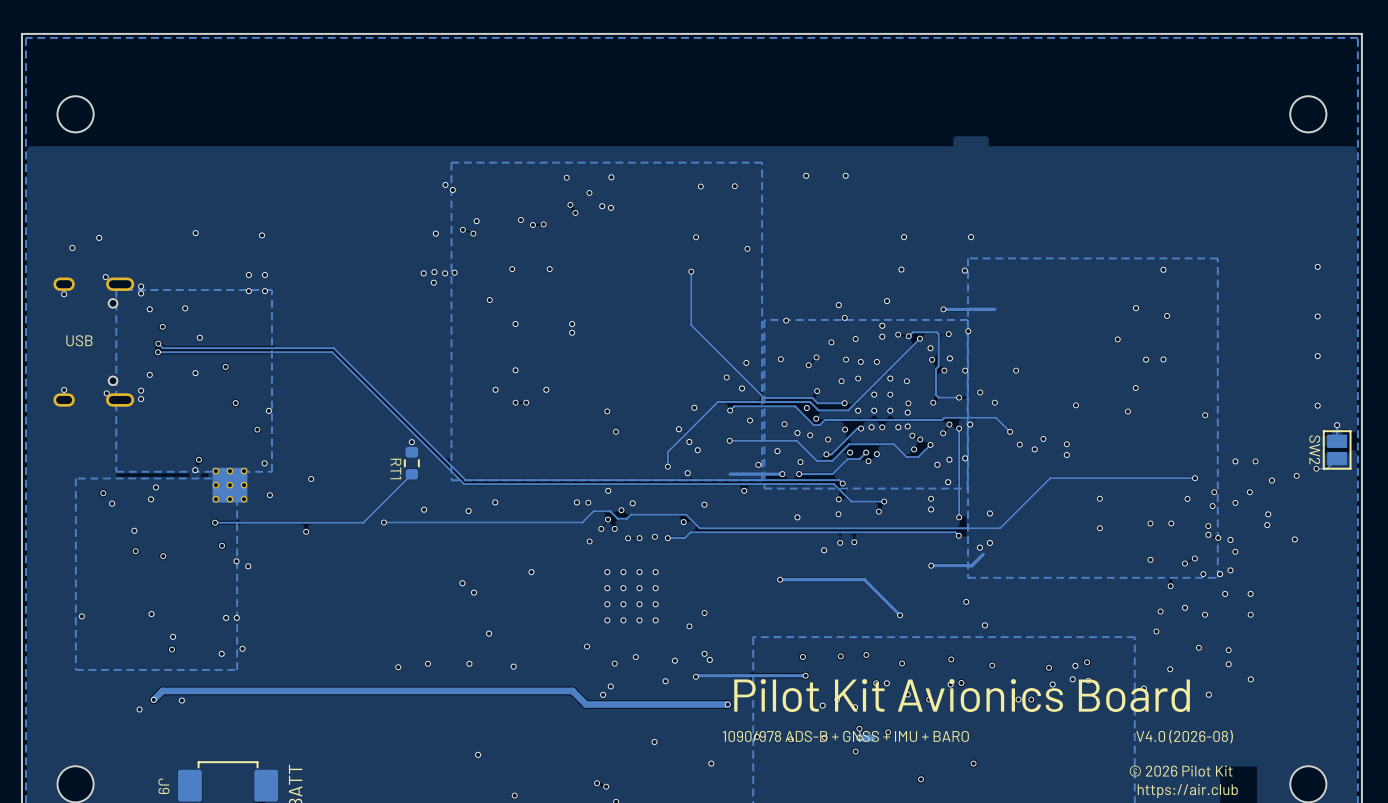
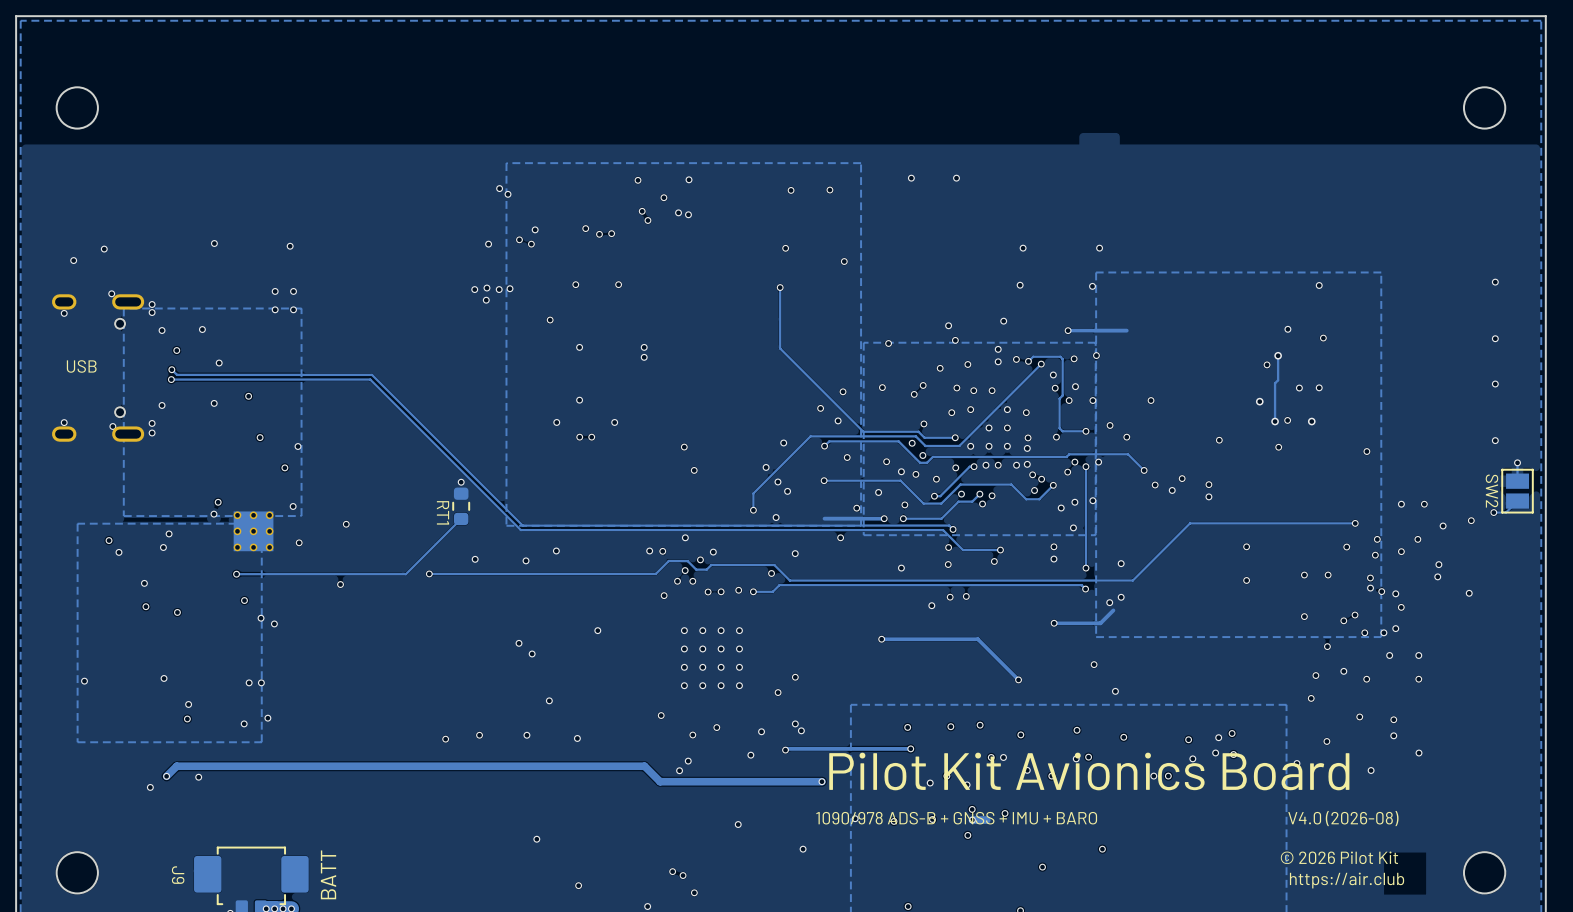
track: none -> (1278, 355) (1278, 380) (1275, 383) (1275, 421)
via: none -> (1278, 355)
via: none -> (1259, 401)
via: none -> (1275, 421)
via: none -> (1311, 421)

